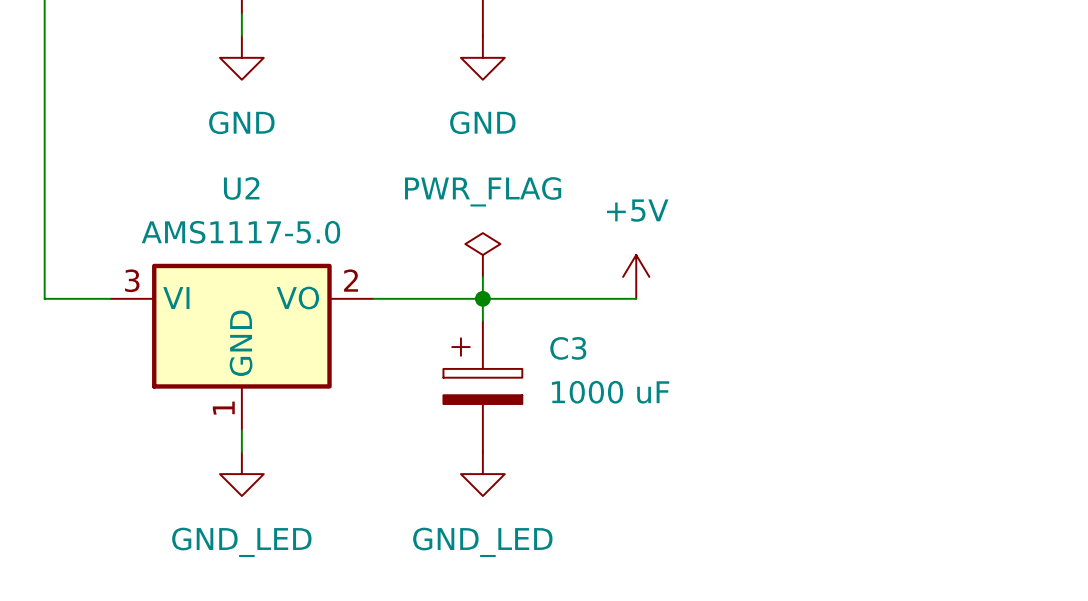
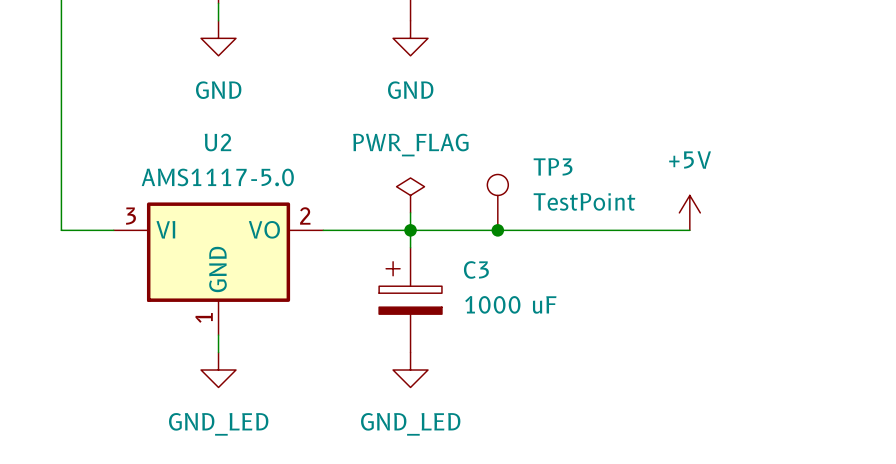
TP3: none -> TestPoint (497, 202)
power symbol position: +5V (636, 276) -> +5V (689, 212)
junction: none -> (497, 230)
wire: none -> (532, 230) (689, 230)

